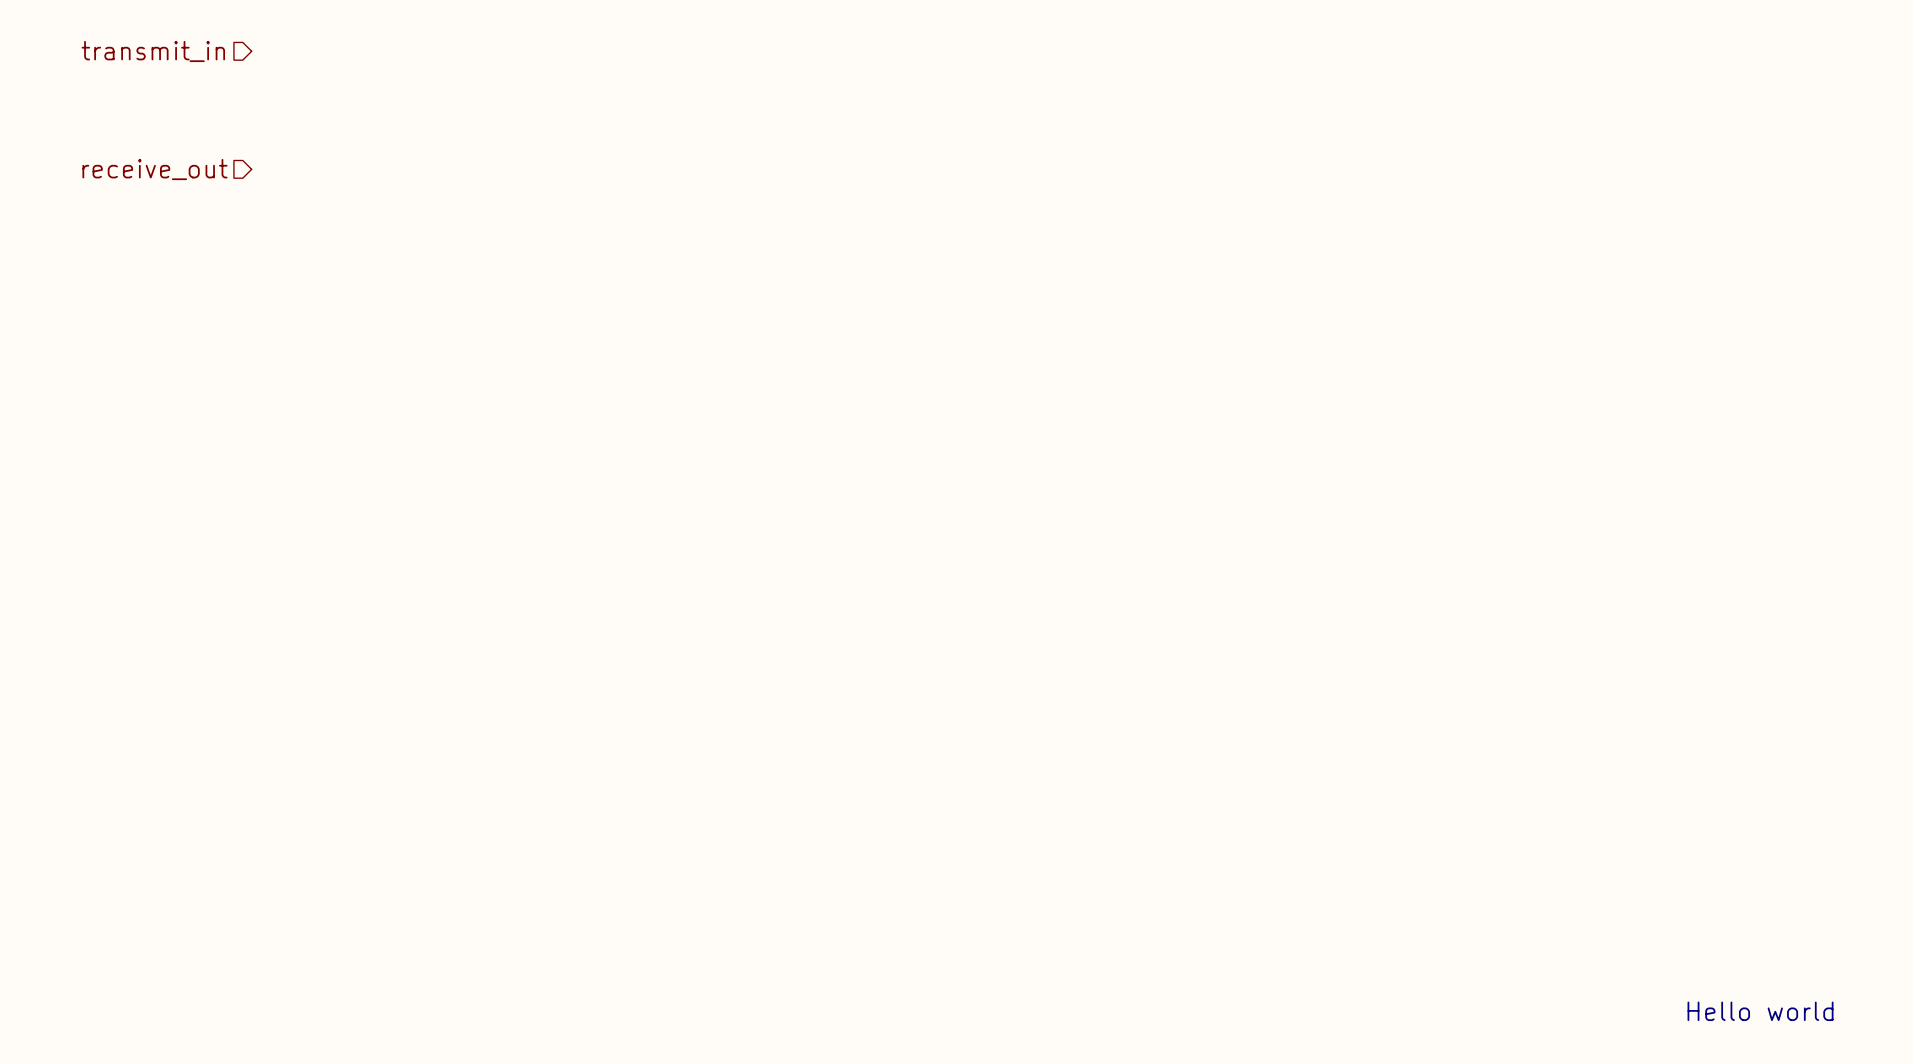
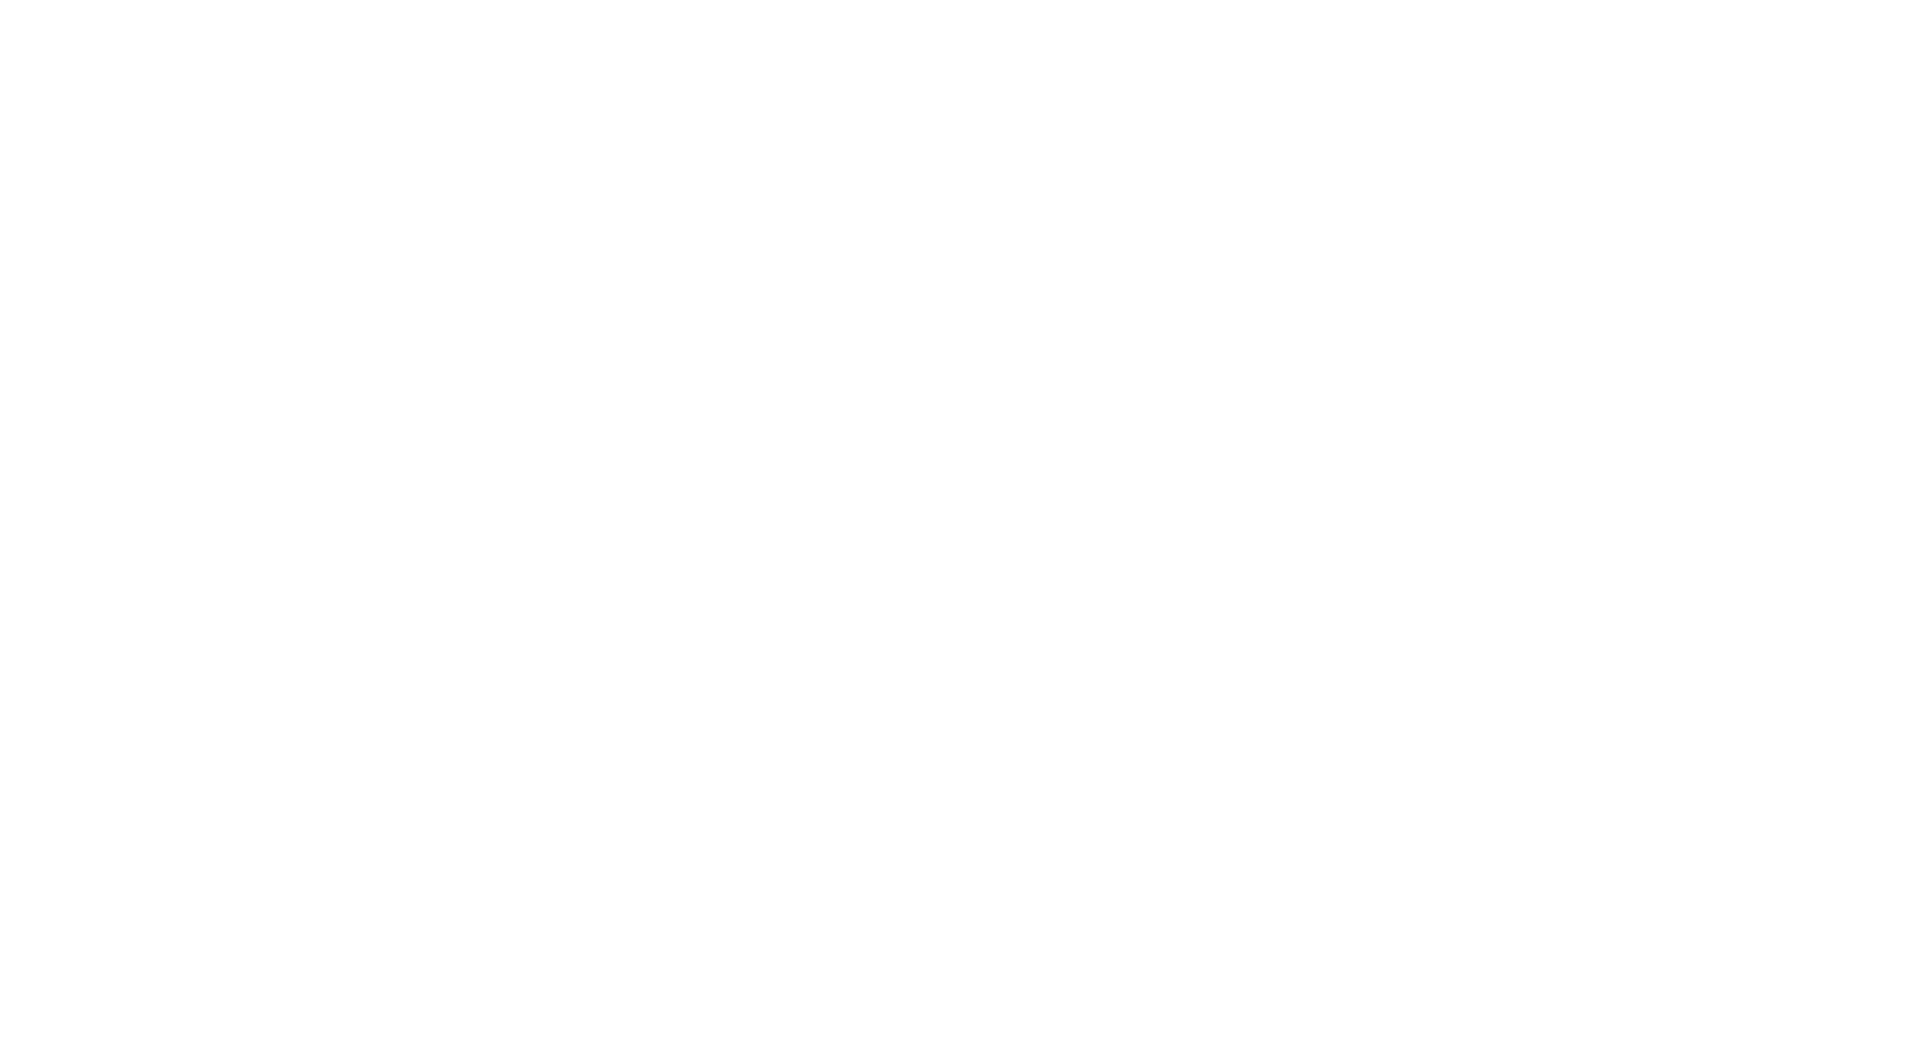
hierarchical label: transmit_in (153, 51) -> none
hierarchical label: receive_out (155, 169) -> none
text: Hello world (1760, 1011) -> none

